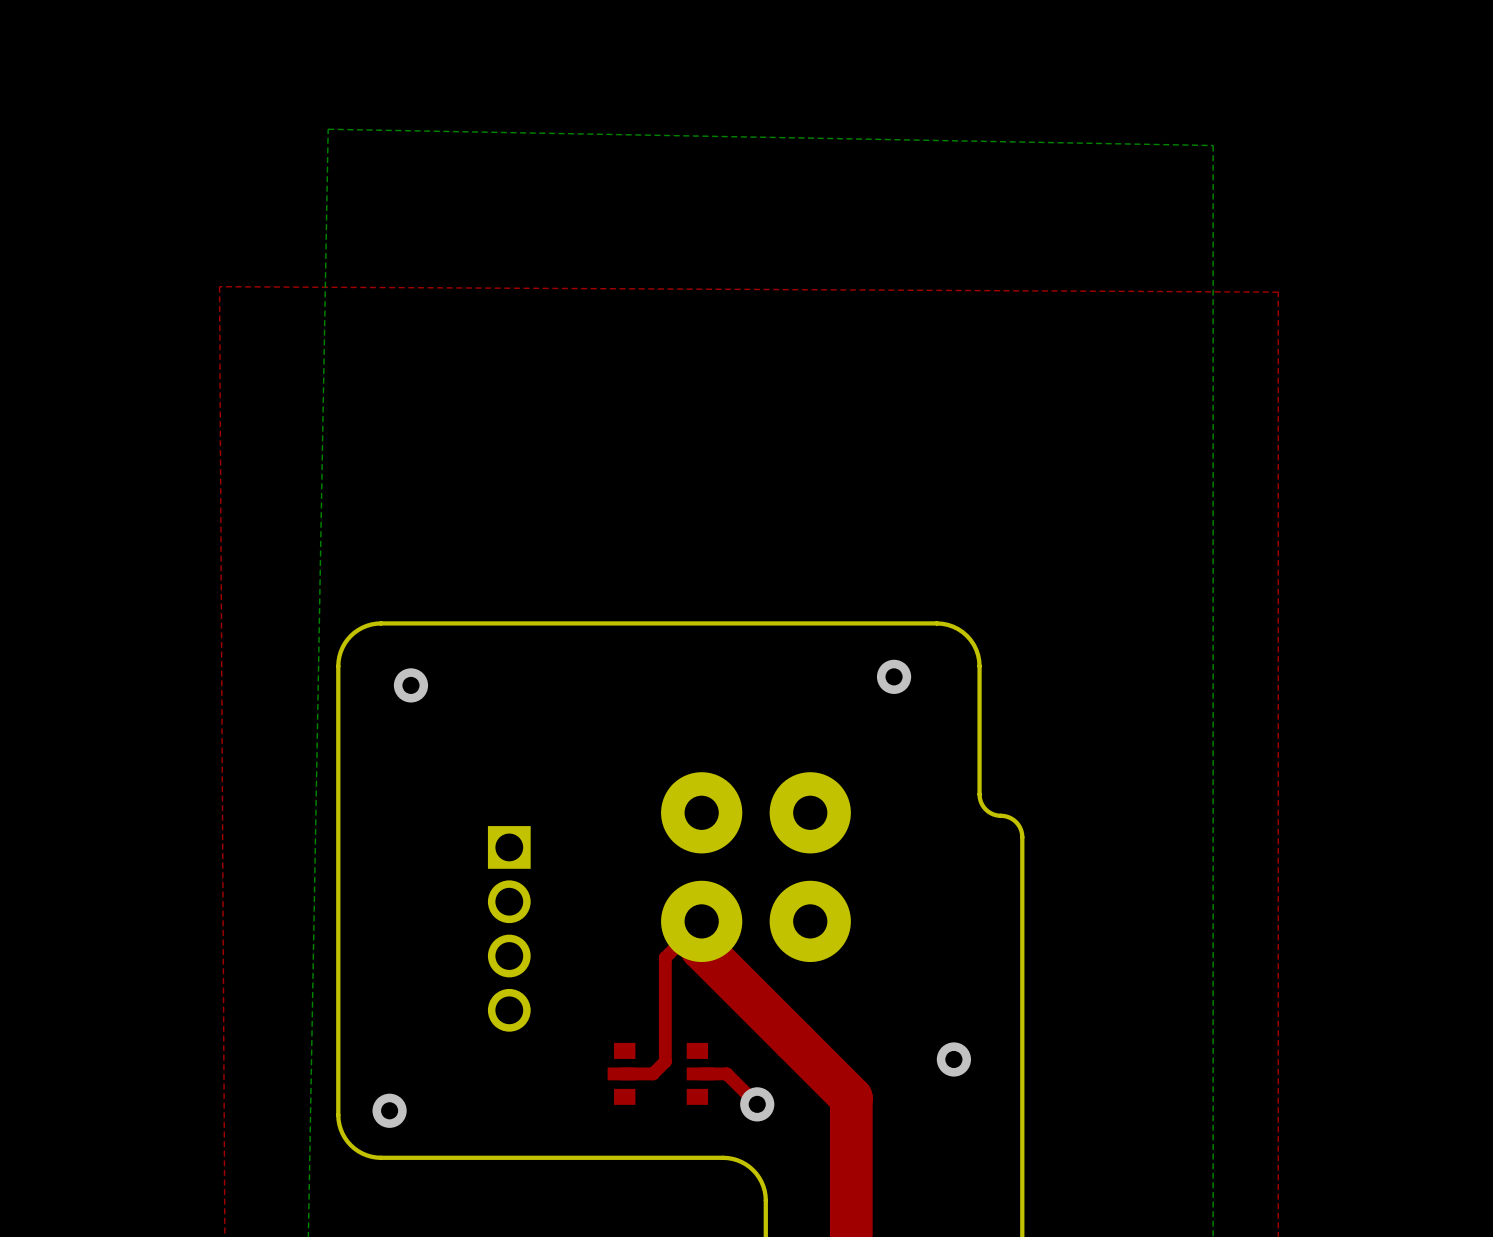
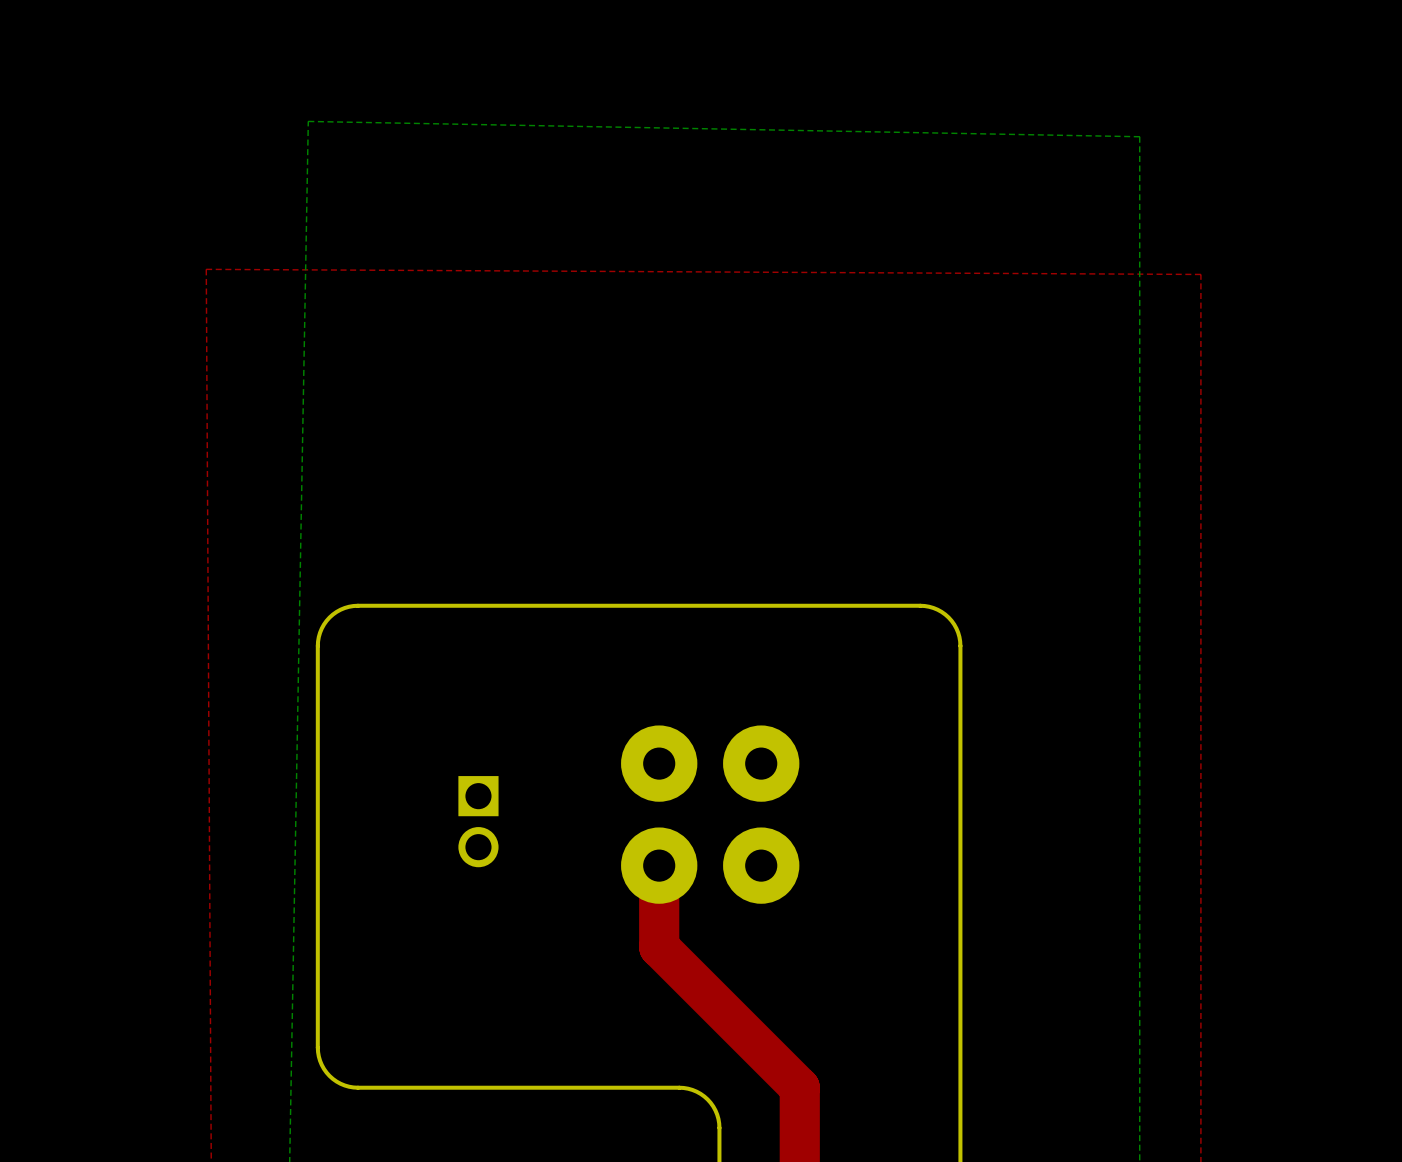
via: (894, 676) -> none
via: (410, 685) -> none
board edge: (338, 687) (338, 661) (344, 643) (358, 629) (376, 623) (947, 624) (967, 635) (976, 649) (979, 660) (979, 794) (981, 802) (990, 812) (1013, 820) (1020, 828) (1022, 837) -> (317, 645) (320, 632) (326, 620) (340, 609) (353, 606) (929, 606) (941, 611) (948, 617) (956, 628) (959, 636) (960, 786)
top track: (701, 921) (665, 957) (665, 1061) (653, 1073) (621, 1073) -> none
part: (509, 928) -> none
top track: (701, 948) (851, 1097) (851, 1157) -> (659, 890) (659, 947) (799, 1087)
via: (953, 1059) -> none
part: (661, 1073) -> none
top track: (700, 1073) (726, 1073) (757, 1104) -> none
via: (757, 1104) -> none
via: (389, 1110) -> none

